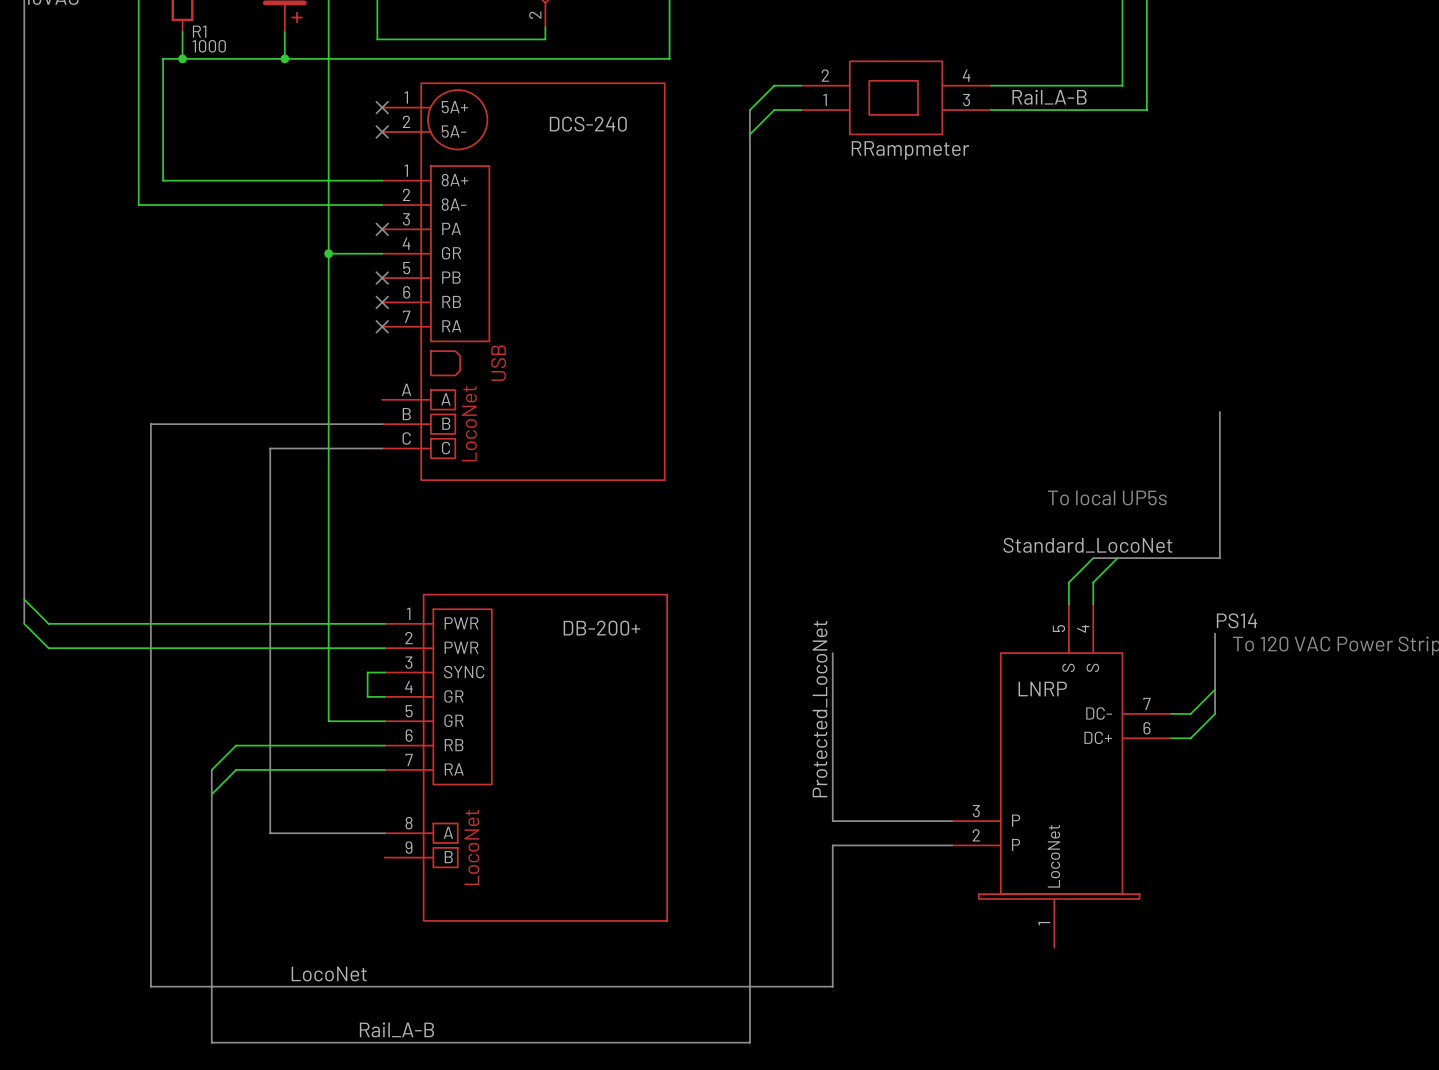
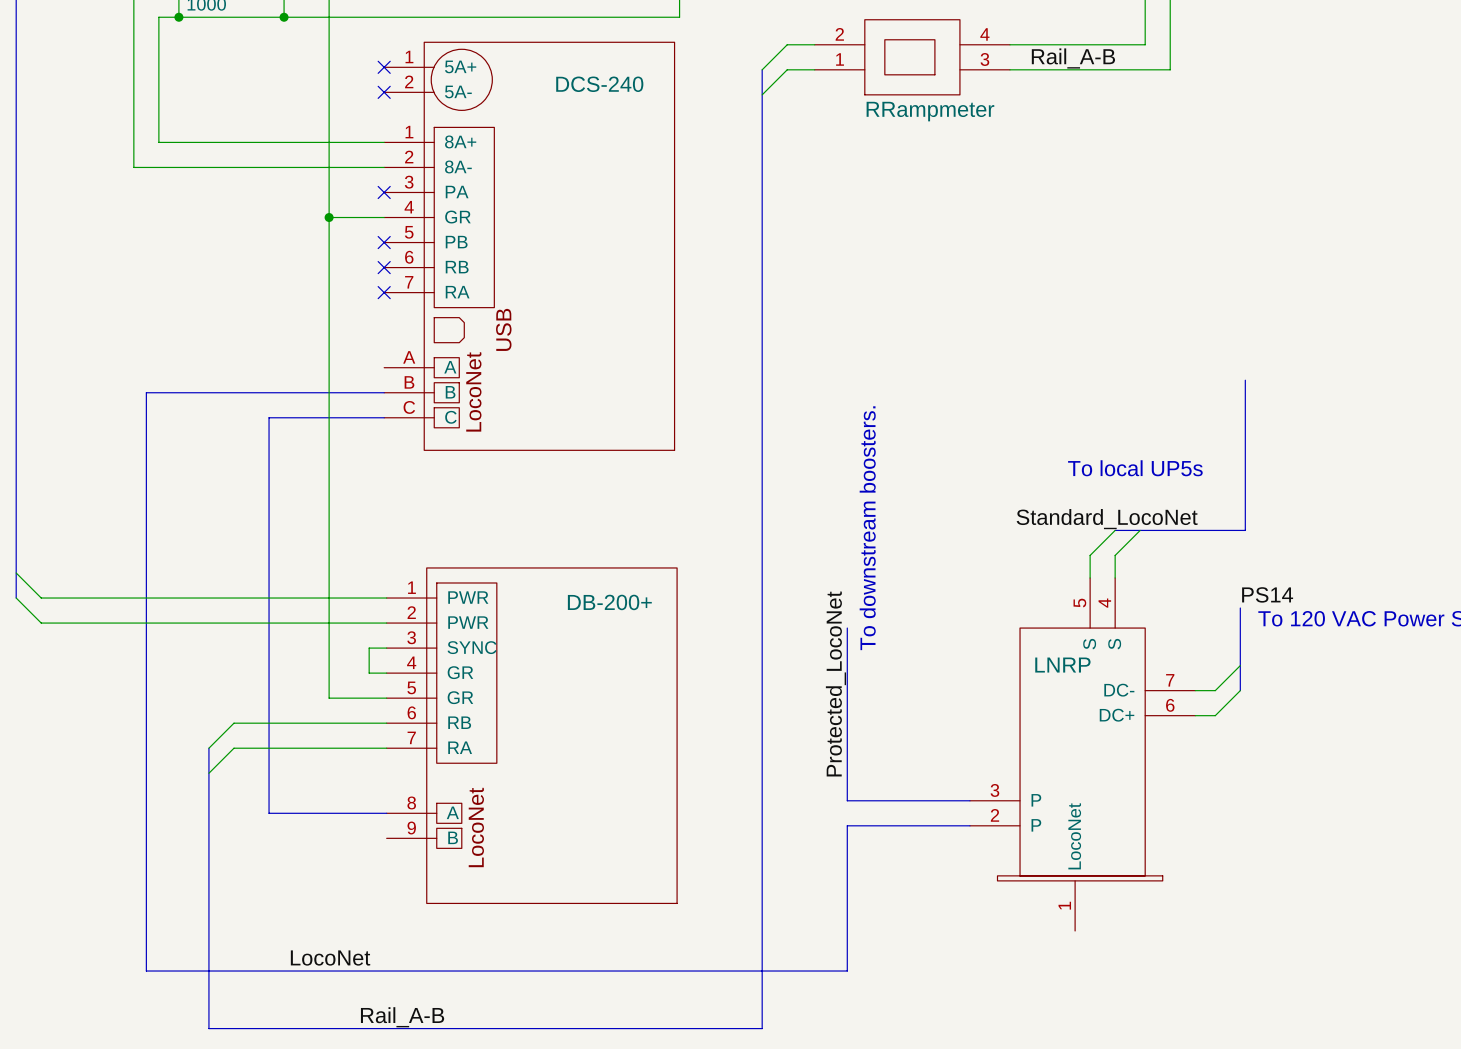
text: none -> To downstream boosters. (867, 528)

